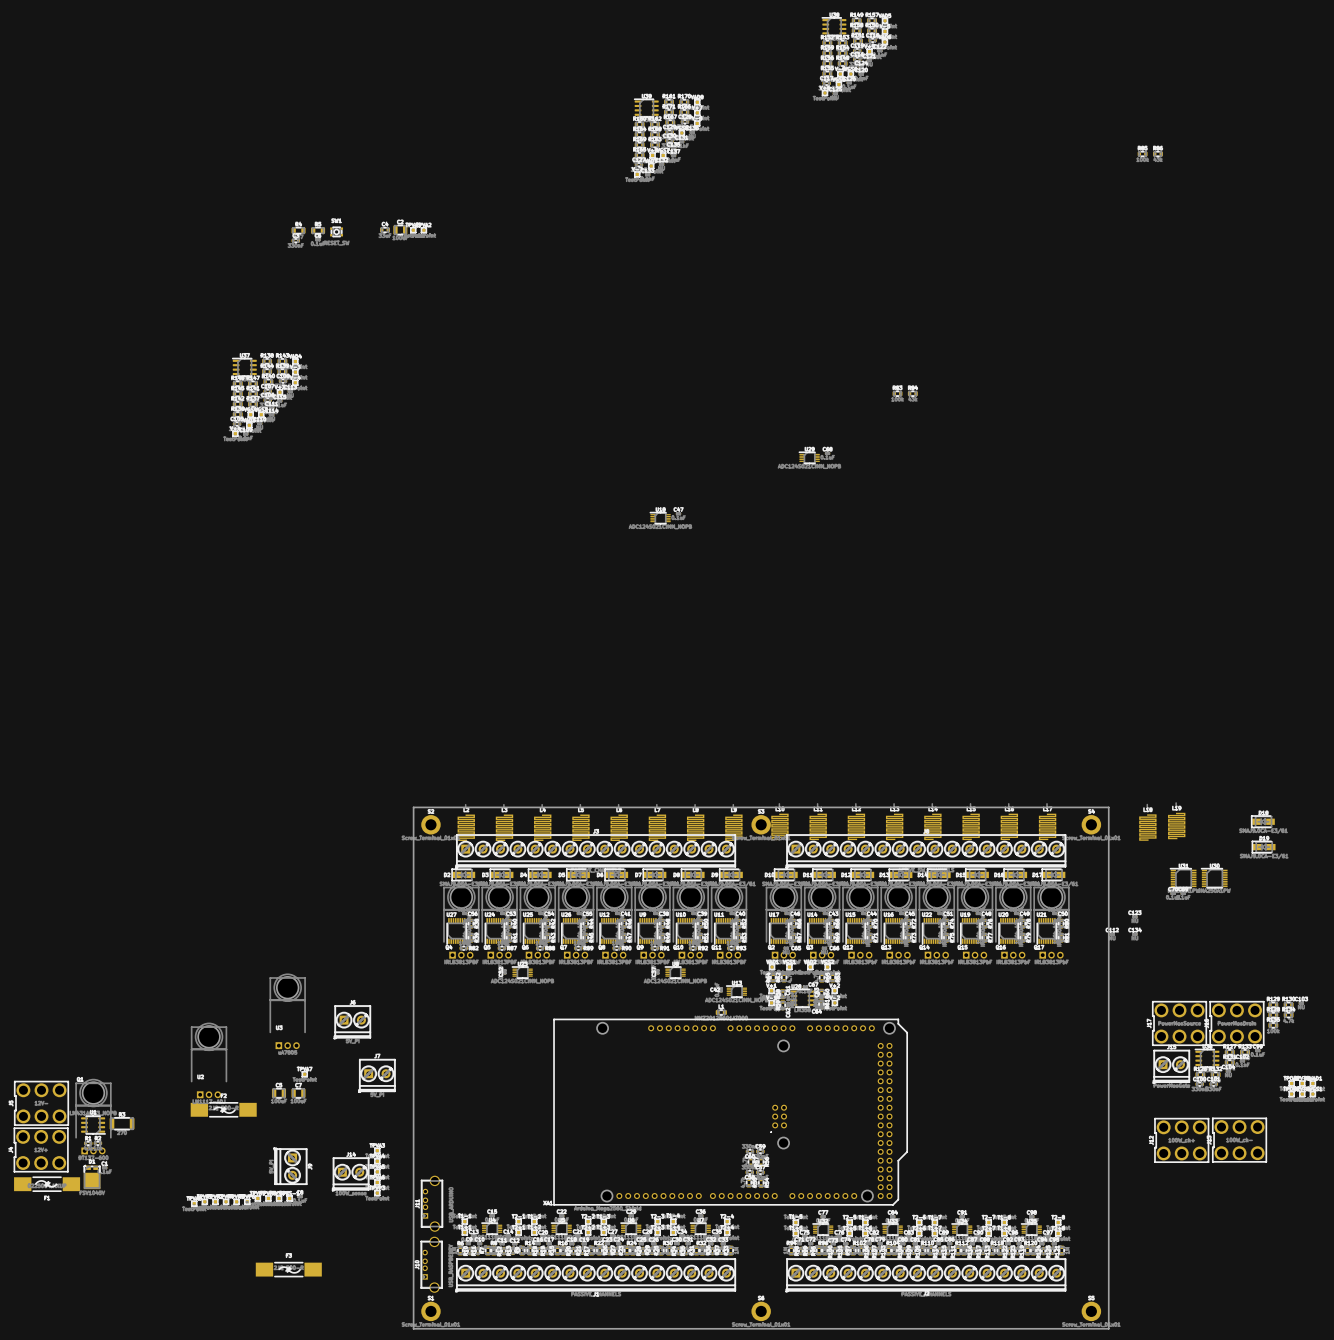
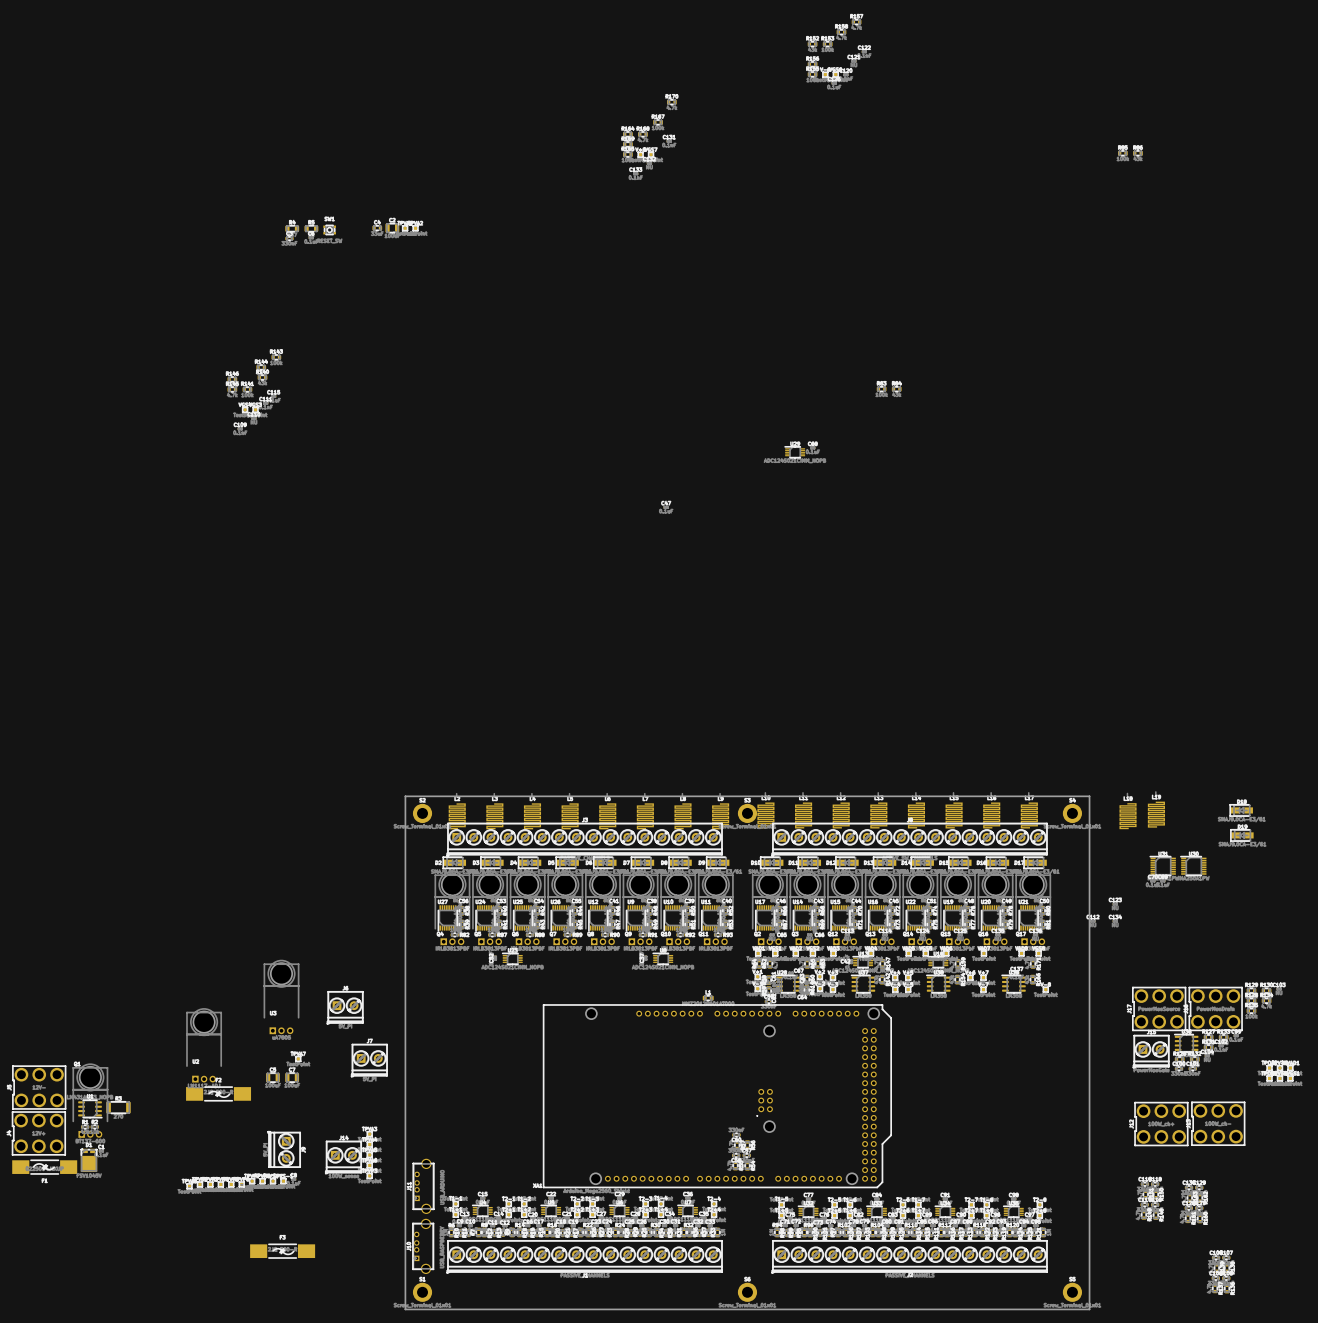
part rotation: 0° (856, 20) -> 90° clockwise (1143, 1214)
part position: (856, 20) -> (1143, 1214)
part position: (885, 20) -> (908, 953)
part position: (834, 26) -> (938, 984)
part rotation: 0° (872, 30) -> 90° clockwise (1155, 1194)
part position: (872, 30) -> (1155, 1194)
part position: (885, 31) -> (908, 989)
part position: (872, 40) -> (1155, 1184)
part rotation: 0° (857, 41) -> 90° clockwise (1145, 1194)
part position: (857, 41) -> (1145, 1194)
part position: (884, 42) -> (946, 953)
part position: (857, 50) -> (1144, 1184)
part position: (869, 51) -> (908, 977)
part rotation: 0° (827, 53) -> 90° clockwise (957, 963)
part position: (827, 53) -> (957, 963)
part rotation: 0° (842, 53) -> 90° clockwise (957, 979)
part position: (842, 53) -> (957, 979)
part position: (857, 59) -> (1155, 1204)
part rotation: 0° (842, 63) -> 90° clockwise (1155, 1215)
part position: (842, 63) -> (1155, 1215)
part position: (861, 67) -> (922, 934)
part position: (826, 83) -> (1144, 1204)
part position: (838, 84) -> (925, 953)
part position: (824, 93) -> (970, 977)
part position: (835, 93) -> (960, 934)
part rotation: 0° (669, 102) -> 90° clockwise (1188, 1218)
part position: (669, 102) -> (1188, 1218)
part position: (697, 102) -> (1021, 953)
part position: (646, 108) -> (1013, 984)
part rotation: 0° (669, 112) -> 90° clockwise (1033, 963)
part position: (669, 112) -> (1033, 963)
part rotation: 0° (684, 112) -> 90° clockwise (1032, 979)
part position: (684, 112) -> (1032, 979)
part position: (697, 112) -> (983, 977)
part position: (684, 121) -> (1188, 1208)
part position: (697, 123) -> (1045, 989)
part rotation: 0° (639, 124) -> 90° clockwise (1200, 1218)
part position: (639, 124) -> (1200, 1218)
part rotation: 0° (654, 124) -> 90° clockwise (1200, 1197)
part position: (654, 124) -> (1200, 1197)
part position: (669, 132) -> (1199, 1187)
part position: (692, 132) -> (1035, 934)
part position: (681, 133) -> (1038, 953)
part position: (669, 140) -> (1189, 1187)
part rotation: 0° (654, 145) -> 90° clockwise (1189, 1197)
part position: (654, 145) -> (1189, 1197)
part position: (673, 148) -> (997, 934)
part position: (673, 155) -> (1016, 973)
part position: (638, 164) -> (1199, 1208)
part position: (651, 166) -> (983, 953)
part position: (637, 174) -> (983, 989)
part rotation: 0° (267, 361) -> 90° clockwise (1227, 1268)
part position: (267, 361) -> (1227, 1268)
part position: (295, 361) -> (871, 953)
part position: (244, 367) -> (863, 984)
part rotation: 0° (282, 371) -> 90° clockwise (1216, 1268)
part position: (282, 371) -> (1216, 1268)
part position: (295, 372) -> (832, 989)
part position: (283, 381) -> (1216, 1257)
part position: (295, 382) -> (895, 989)
part rotation: 0° (253, 383) -> 90° clockwise (882, 963)
part position: (253, 383) -> (882, 963)
part position: (267, 391) -> (1226, 1257)
part position: (290, 391) -> (847, 934)
part position: (279, 392) -> (832, 977)
part position: (267, 400) -> (1215, 1278)
part rotation: 0° (237, 404) -> 90° clockwise (882, 979)
part position: (237, 404) -> (882, 979)
part rotation: 0° (253, 404) -> 90° clockwise (1215, 1288)
part position: (253, 404) -> (1215, 1288)
part rotation: 0° (237, 414) -> 90° clockwise (1227, 1288)
part position: (237, 414) -> (1227, 1288)
part position: (271, 414) -> (885, 934)
part position: (237, 424) -> (1226, 1278)
part position: (249, 425) -> (833, 953)
part position: (235, 433) -> (895, 977)
part position: (660, 518) -> (938, 962)
part position: (721, 989) -> (851, 961)
part position: (736, 991) -> (862, 962)
part position: (760, 1151) -> (768, 1001)

